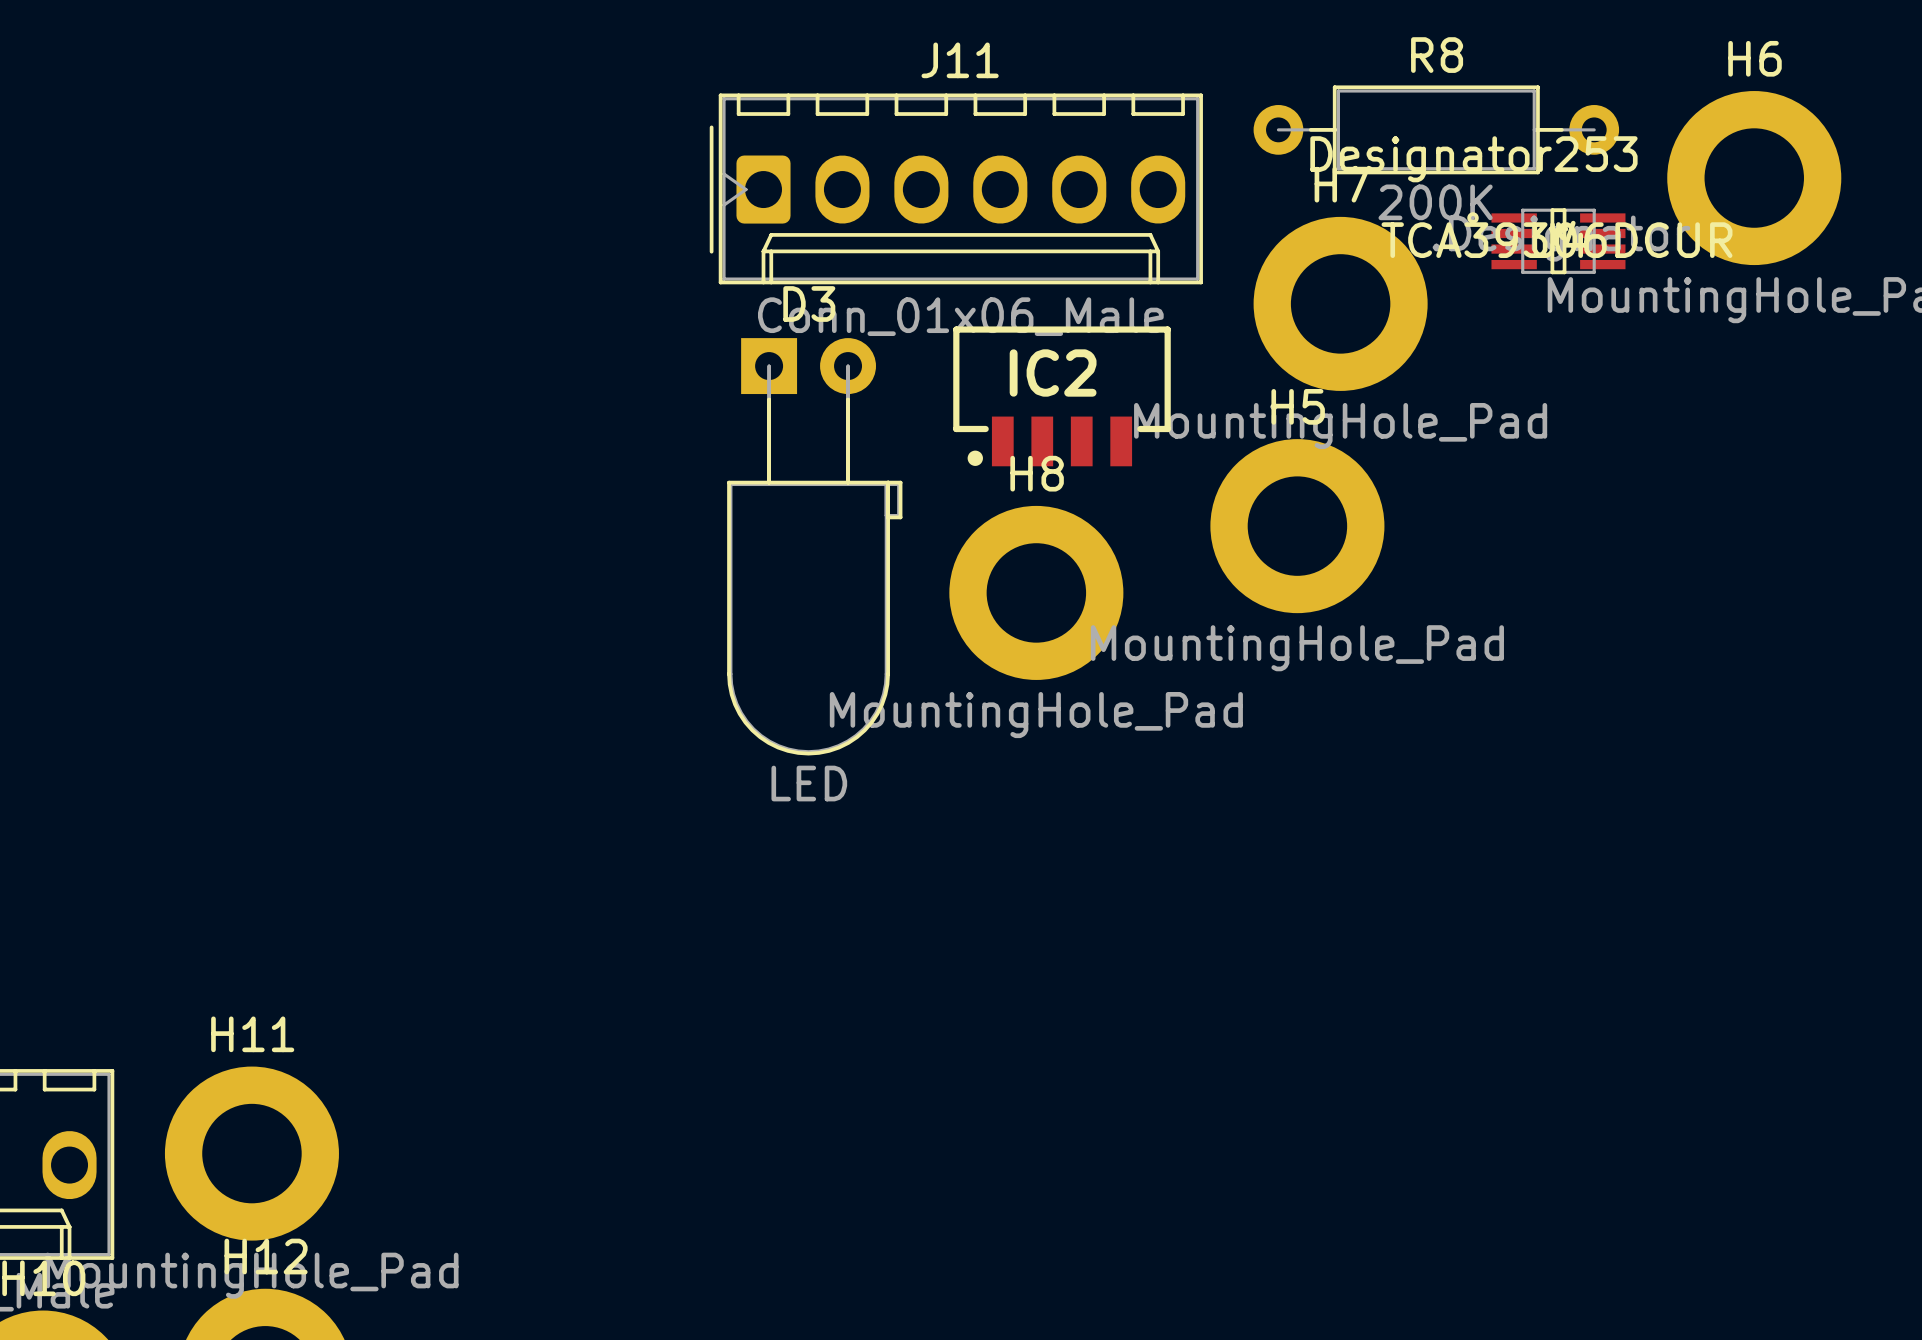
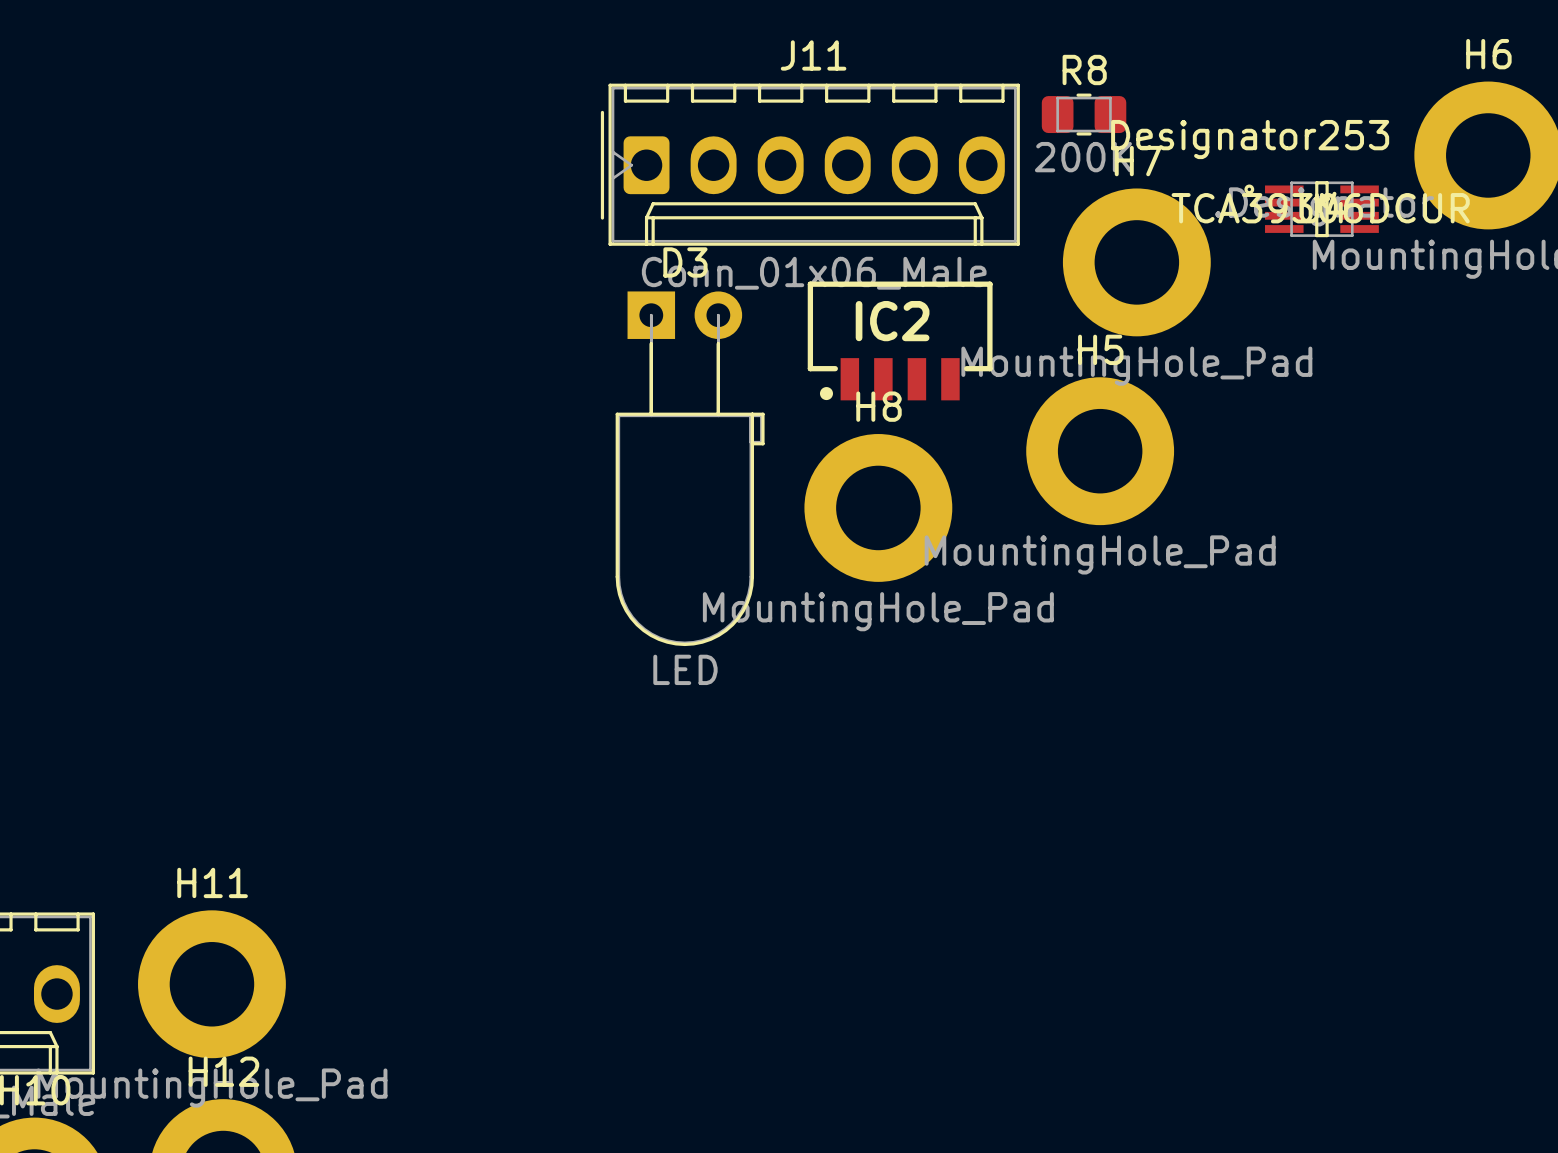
R8 footprint: [1253, 85, 1620, 175] -> [1041, 93, 1127, 136]

